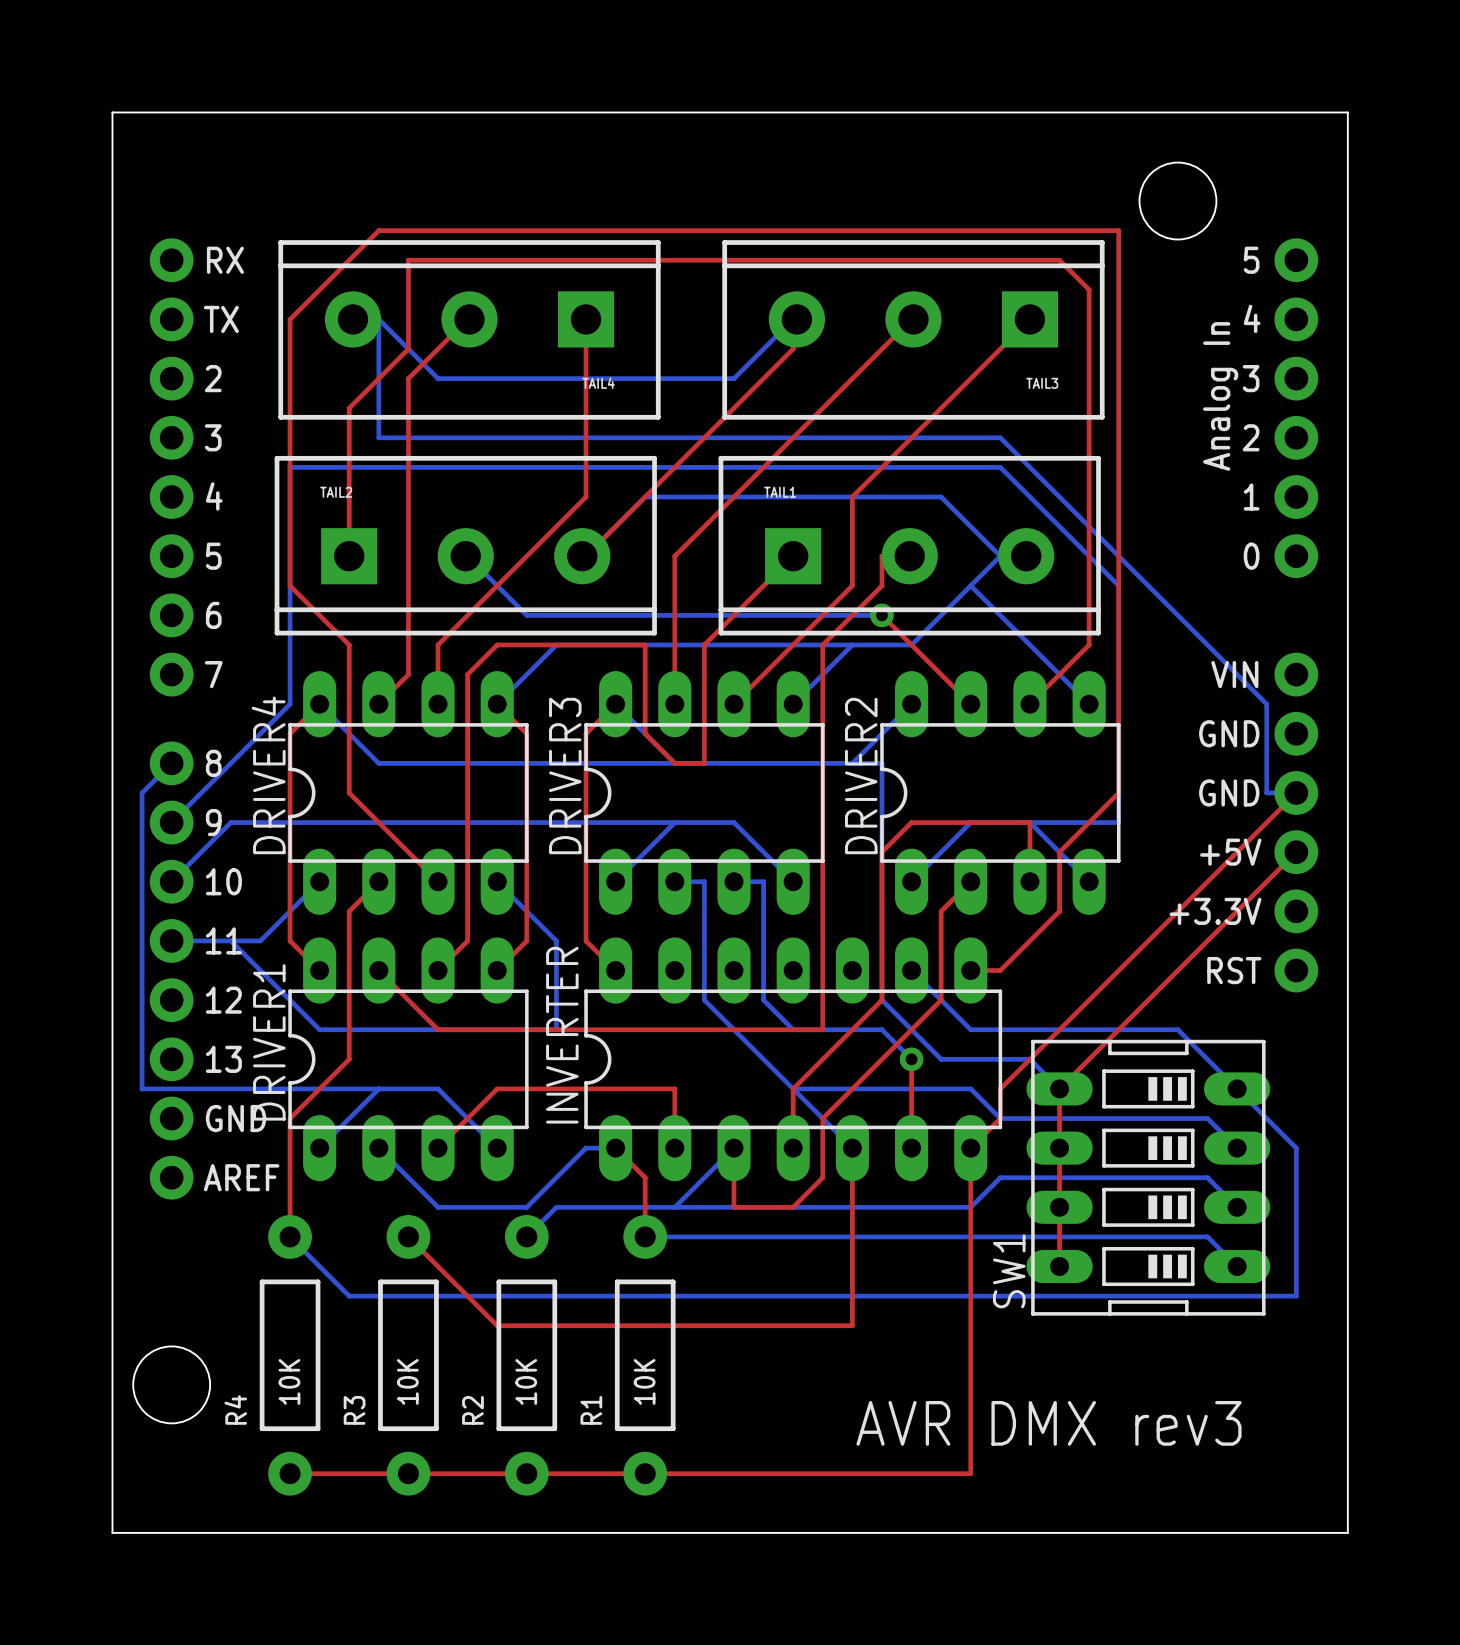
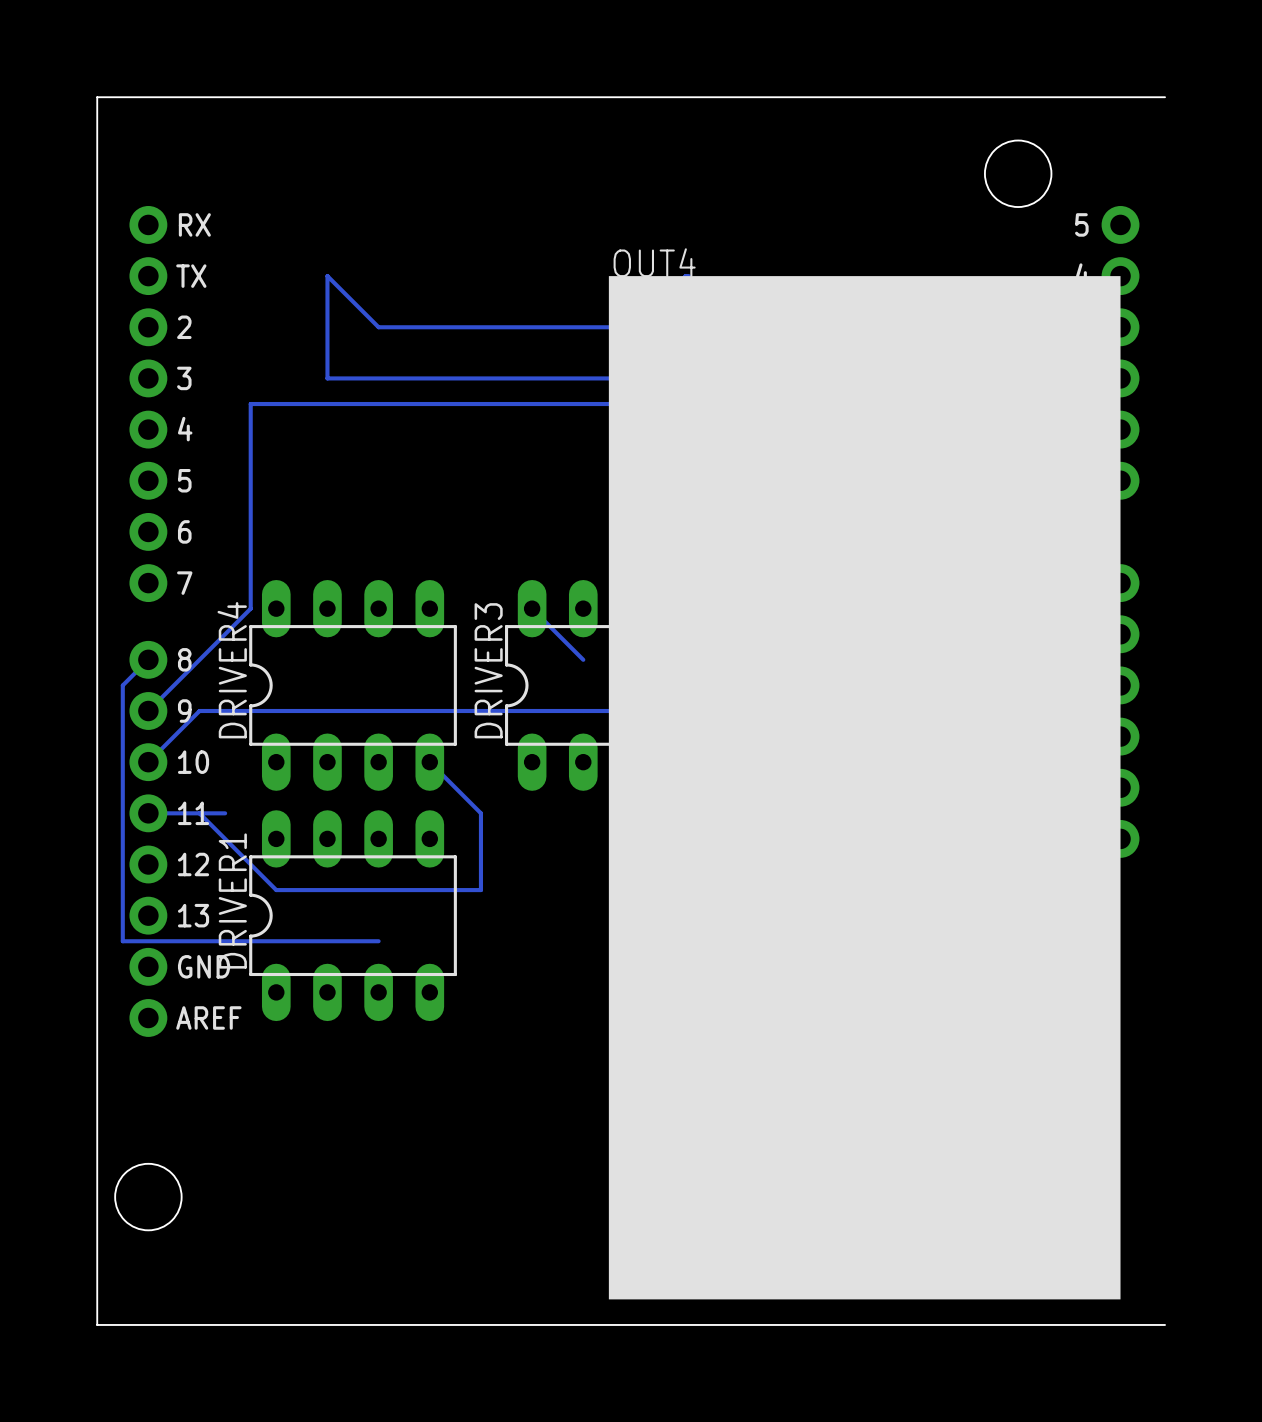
board edge: (1347, 112) (1347, 1532) -> none
top track: (469, 319) (408, 378) (408, 674) (378, 704) -> none
top track: (586, 319) (586, 497) (438, 644) (438, 704) -> none
top track: (796, 319) (793, 319) (793, 349) (586, 556) (582, 556) -> none
top track: (913, 319) (674, 556) (674, 704) -> none
top track: (1029, 319) (852, 497) (852, 585) (734, 704) -> none
TAIL4: (469, 329) -> none
TAIL3: (913, 329) -> none
TAIL2: (465, 545) -> none
TAIL1: (909, 545) -> none
top track: (349, 556) (349, 408) (408, 349) (408, 260) (1059, 260) (1089, 289) (1089, 644) (1029, 704) -> none
bottom track: (465, 556) (526, 615) (881, 615) -> none
bottom track: (582, 556) (586, 556) (645, 497) (941, 497) (1000, 556) -> none
top track: (793, 556) (704, 644) (704, 763) (674, 763) (645, 733) (645, 644) (497, 644) (467, 674) (467, 940) (438, 970) -> none
top track: (909, 556) (881, 556) (881, 585) (822, 644) (822, 1029) (438, 1029) (378, 970) -> none
bottom track: (1000, 556) (911, 644) (556, 644) (497, 704) -> none
bottom track: (970, 585) (1089, 704) -> none
top track: (881, 615) (970, 704) -> none
via: (881, 615) -> none
OUT4: none -> (864, 531)
bottom track: (852, 644) (793, 704) -> none
top track: (319, 704) (290, 733) (290, 940) (319, 970) -> none
bottom track: (319, 704) (378, 763) (881, 763) (881, 1000) (941, 1059) (1029, 1059) (1059, 1088) -> none
top track: (497, 704) (526, 733) (526, 940) (497, 970) -> none
top track: (615, 704) (586, 733) (586, 940) (615, 970) -> none
bottom track: (911, 704) (852, 763) -> none
bottom track: (674, 822) (615, 881) -> none
bottom track: (734, 822) (793, 881) -> none
bottom track: (970, 822) (911, 881) -> none
bottom track: (1029, 822) (1089, 881) -> none
top track: (1296, 852) (1059, 1088) (1059, 1266) -> none
bottom track: (319, 881) (260, 940) -> none
top track: (378, 881) (349, 911) (349, 1059) (290, 1118) (290, 1236) -> none
top track: (438, 881) (349, 792) (349, 644) (290, 585) (290, 319) (378, 230) (1118, 230) (1118, 792) (1059, 852) (1059, 911) (1000, 970) (970, 970) -> none
bottom track: (674, 881) (704, 881) (704, 1000) (852, 1148) -> none
bottom track: (734, 881) (763, 881) (763, 1000) (793, 1029) (881, 1029) (911, 1059) -> none
top track: (970, 881) (941, 911) (941, 1000) (822, 1118) (822, 1177) (793, 1207) (734, 1207) (734, 1148) -> none
top track: (1029, 881) (1029, 822) (911, 822) (881, 852) (881, 1000) (793, 1088) (793, 1148) -> none
bottom track: (911, 970) (970, 1029) (1177, 1029) (1296, 1148) (1296, 1296) (349, 1296) (290, 1236) -> none
INVERTER: (793, 1059) -> none
top track: (911, 1059) (911, 1148) -> none
via: (911, 1059) -> none
bottom track: (378, 1088) (319, 1148) -> none
bottom track: (438, 1088) (497, 1148) -> none
bottom track: (793, 1088) (970, 1088) (1000, 1118) (1207, 1118) (1237, 1148) -> none
bottom track: (378, 1148) (438, 1207) (526, 1207) (586, 1148) (615, 1148) -> none
top track: (438, 1148) (497, 1088) (674, 1088) (674, 1148) -> none
top track: (615, 1148) (645, 1177) (645, 1236) -> none
bottom track: (734, 1148) (674, 1207) -> none
top track: (852, 1148) (852, 1325) (497, 1325) (408, 1236) -> none
SW1: (1148, 1177) -> none
part: none -> (864, 1043)
bottom track: (1237, 1207) (1207, 1177) (1000, 1177) (970, 1207) (556, 1207) (526, 1236) -> none
bottom track: (645, 1236) (1207, 1236) (1237, 1266) -> none
R4: 10K (290, 1355) -> none
R3: 10K (408, 1355) -> none
R2: 10K (526, 1355) -> none
R1: 10K (645, 1355) -> none
top track: (290, 1473) (970, 1473) -> none

